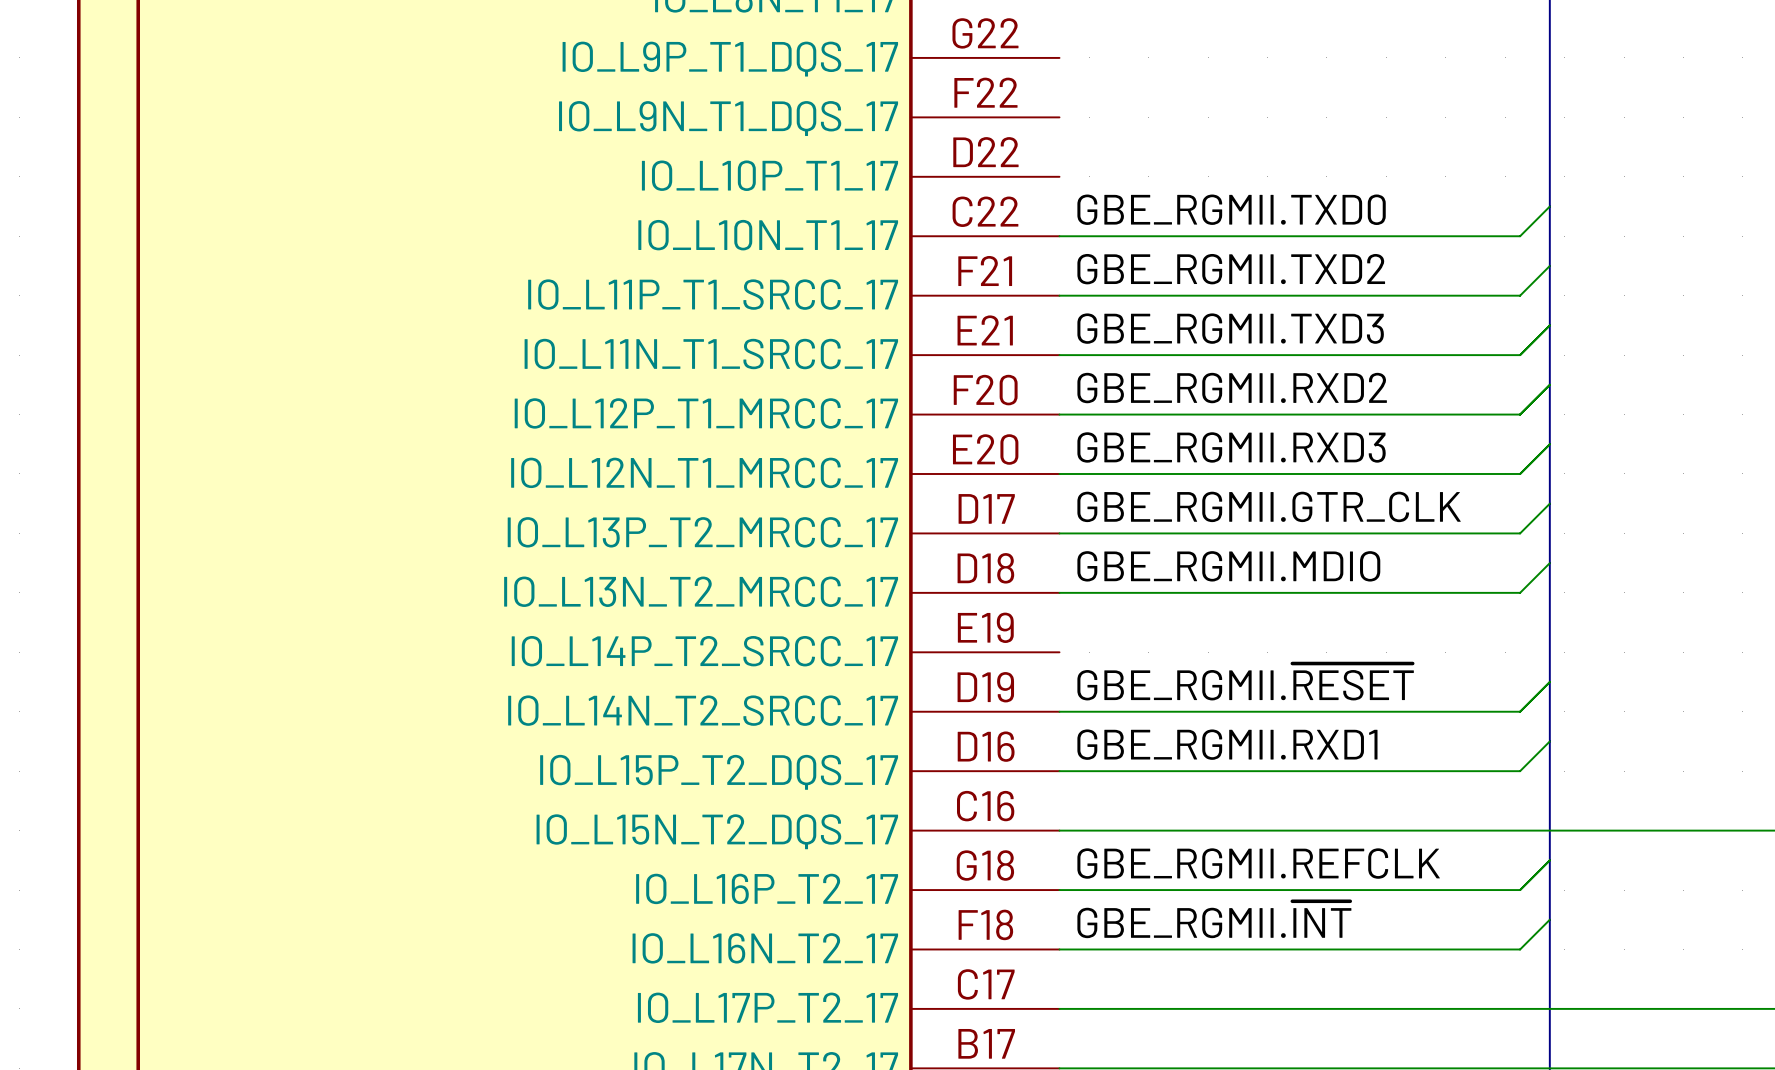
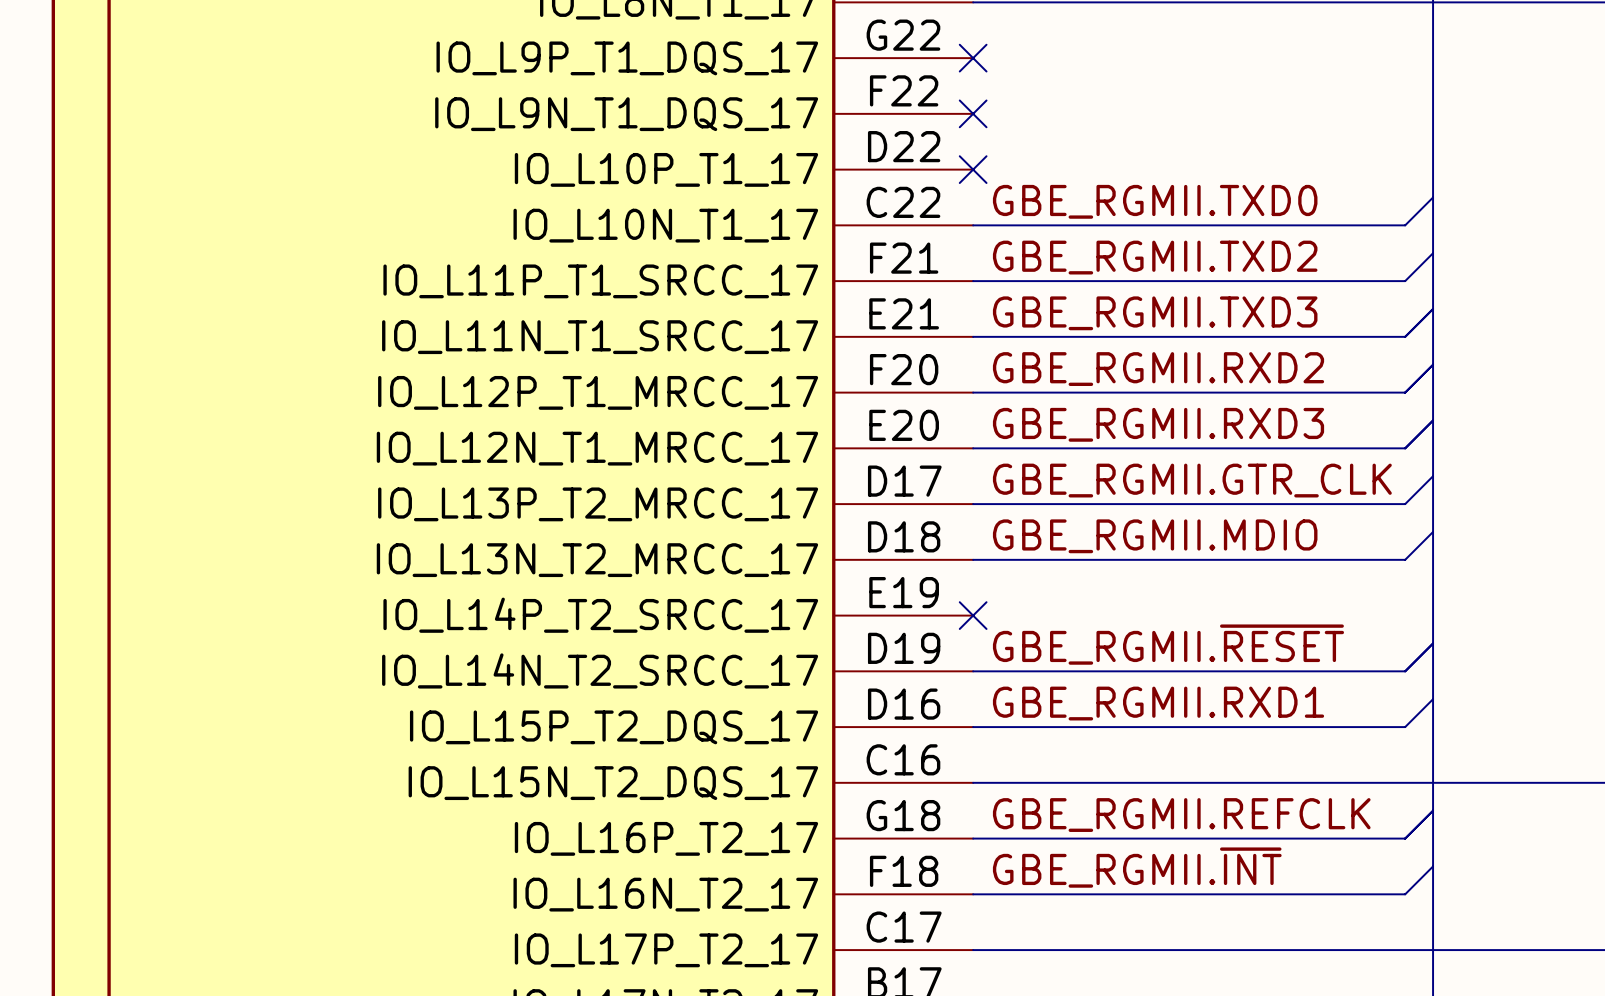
no-connect mark: none -> (973, 58)
no-connect mark: none -> (973, 113)
no-connect mark: none -> (973, 169)
no-connect mark: none -> (973, 615)

